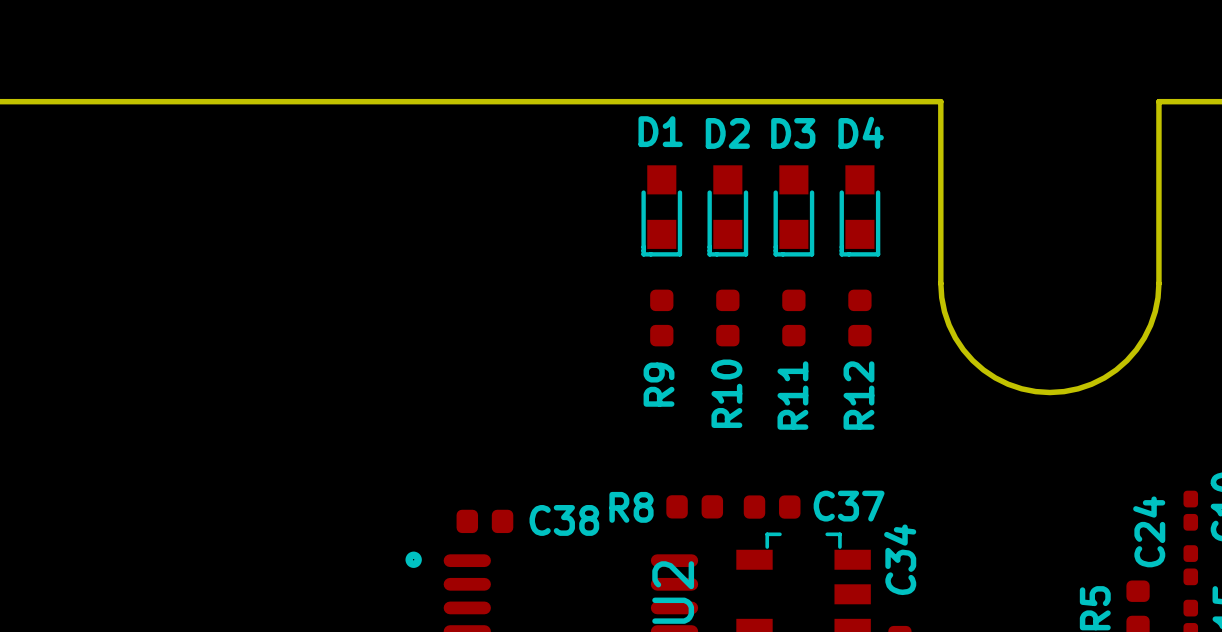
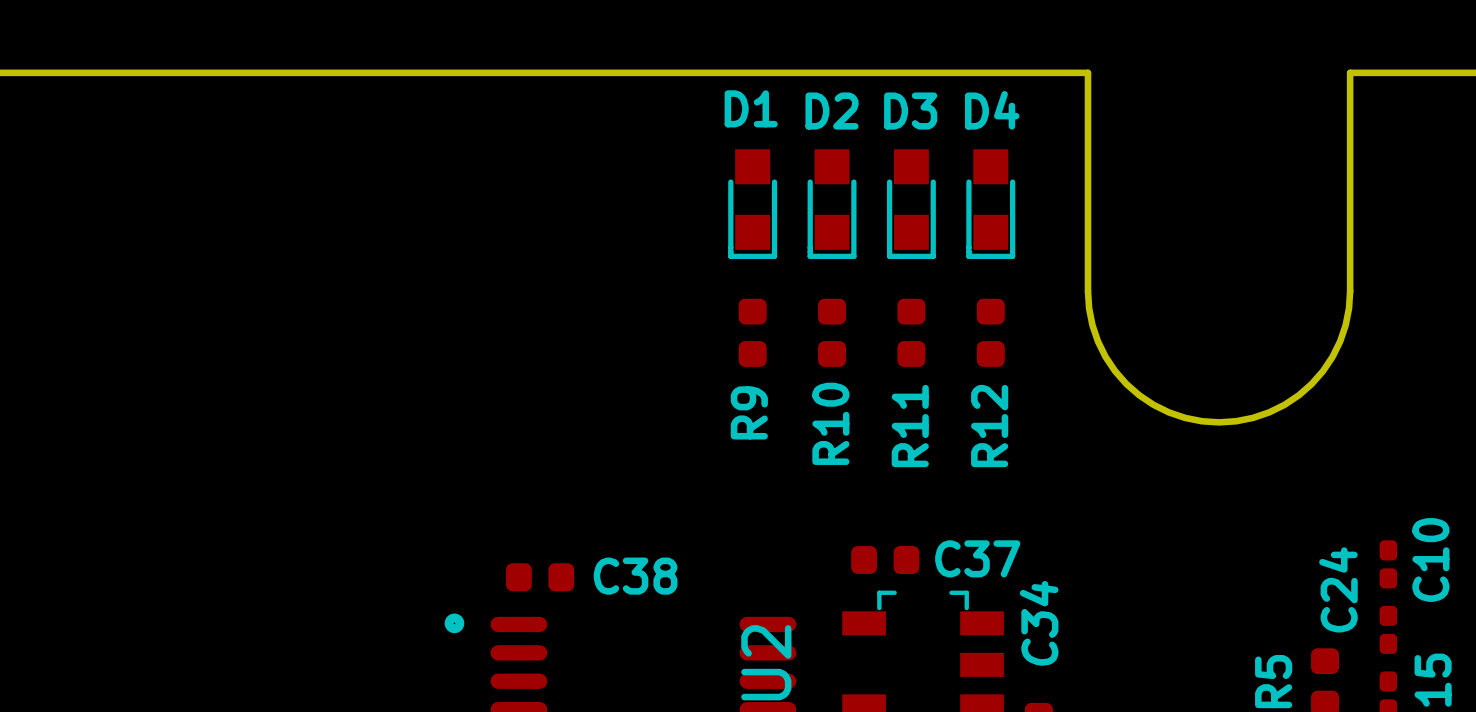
R8: (694, 506) -> none

